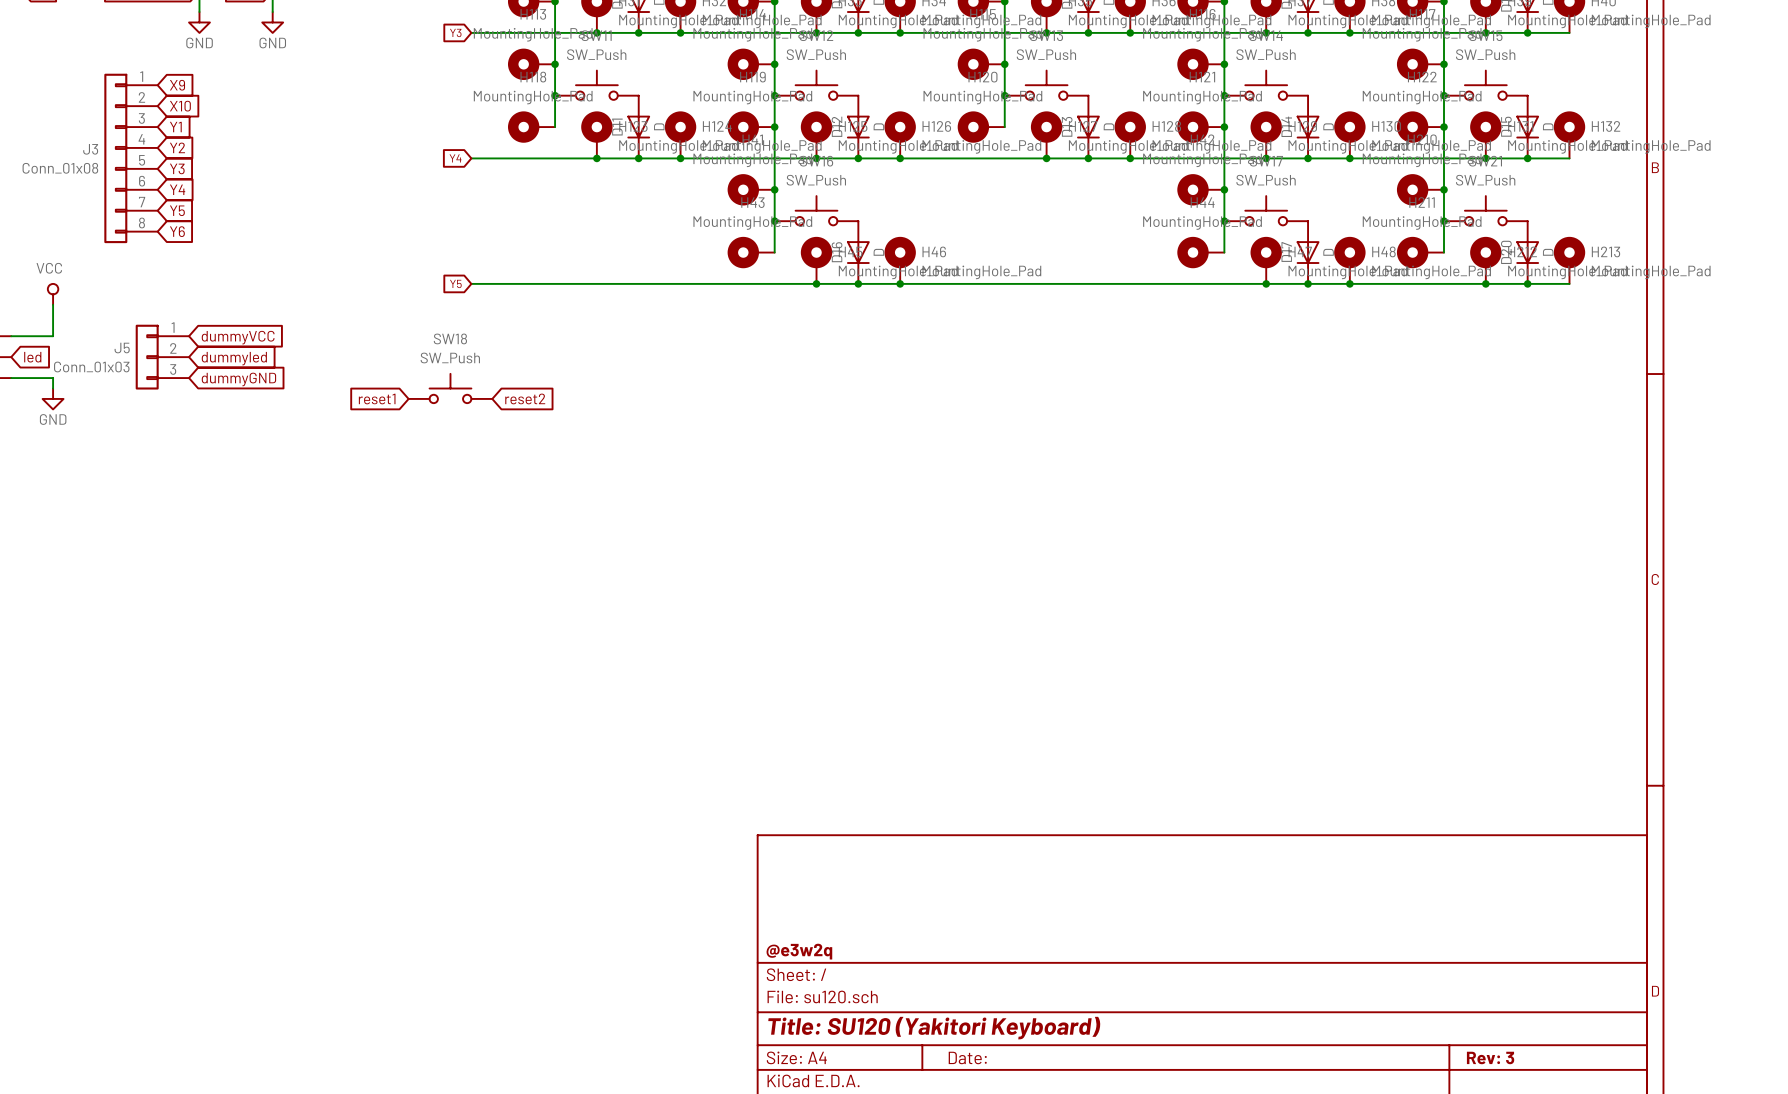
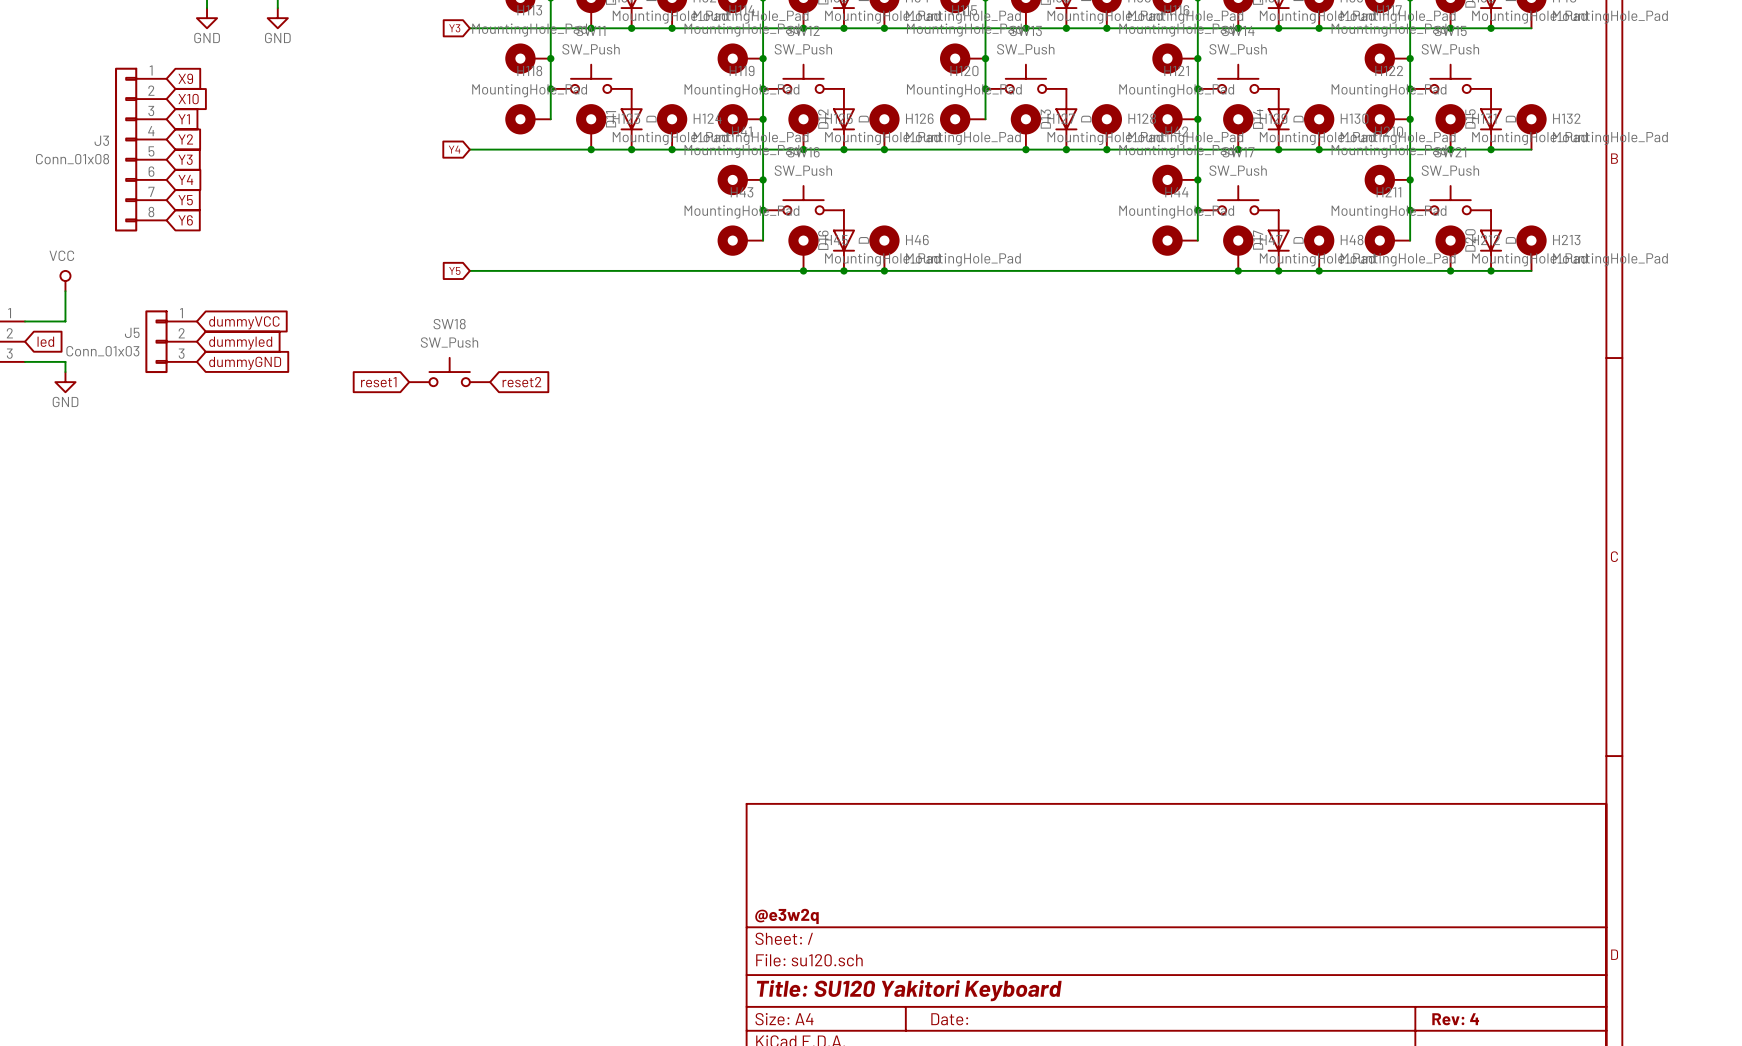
title block: Title: SU120 (Yakitori Keyboard) (934, 1028) -> Title: SU120 Yakitori Keyboard (909, 990)
title block: Rev: 3 (1490, 1057) -> Rev: 4 (1455, 1019)

